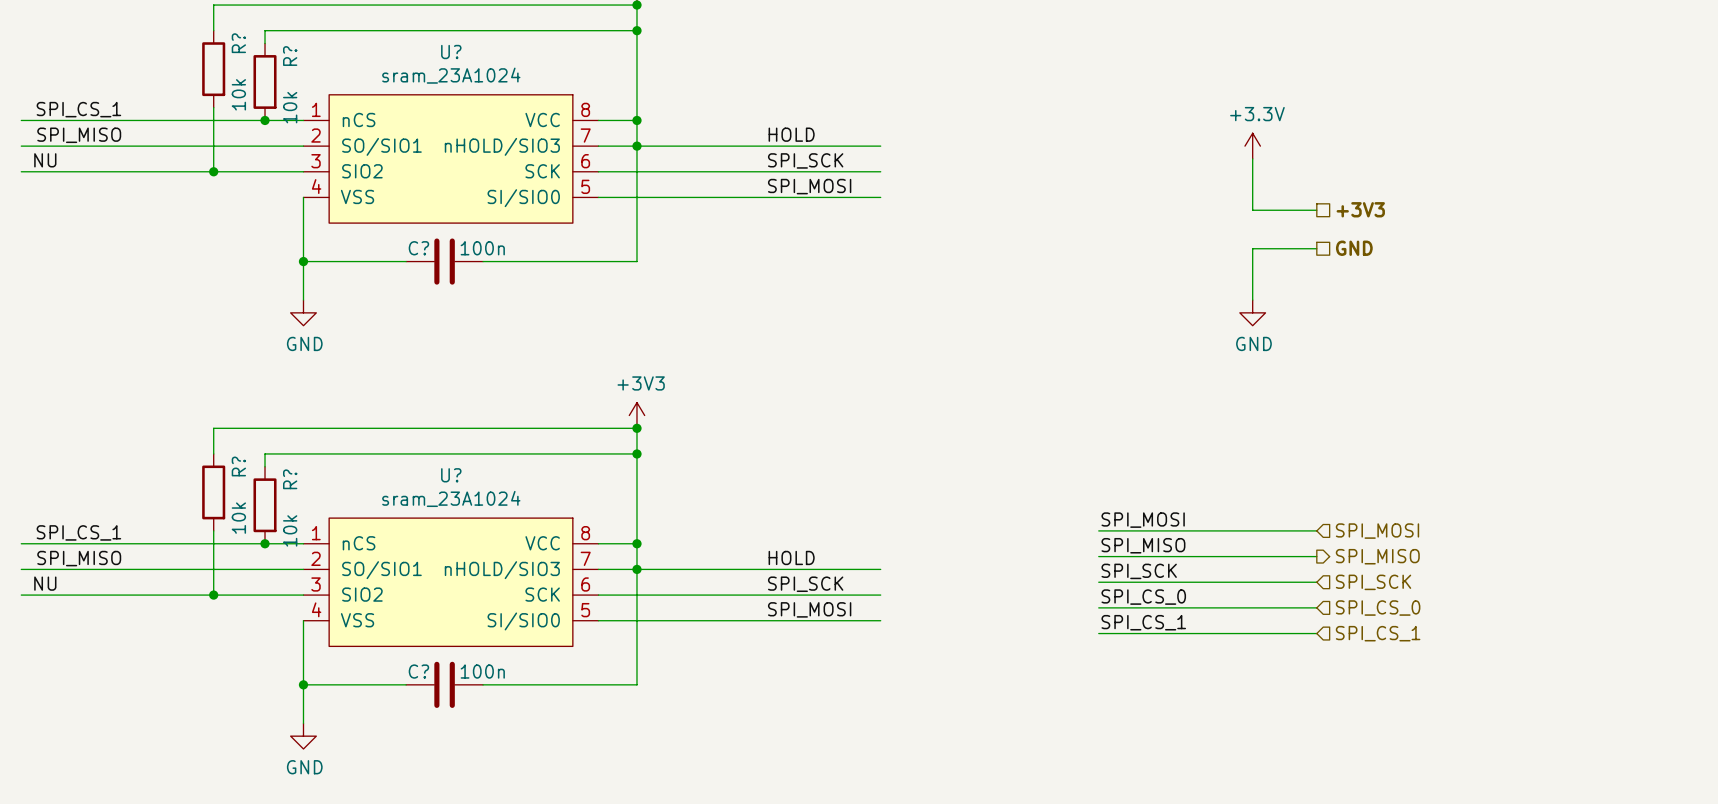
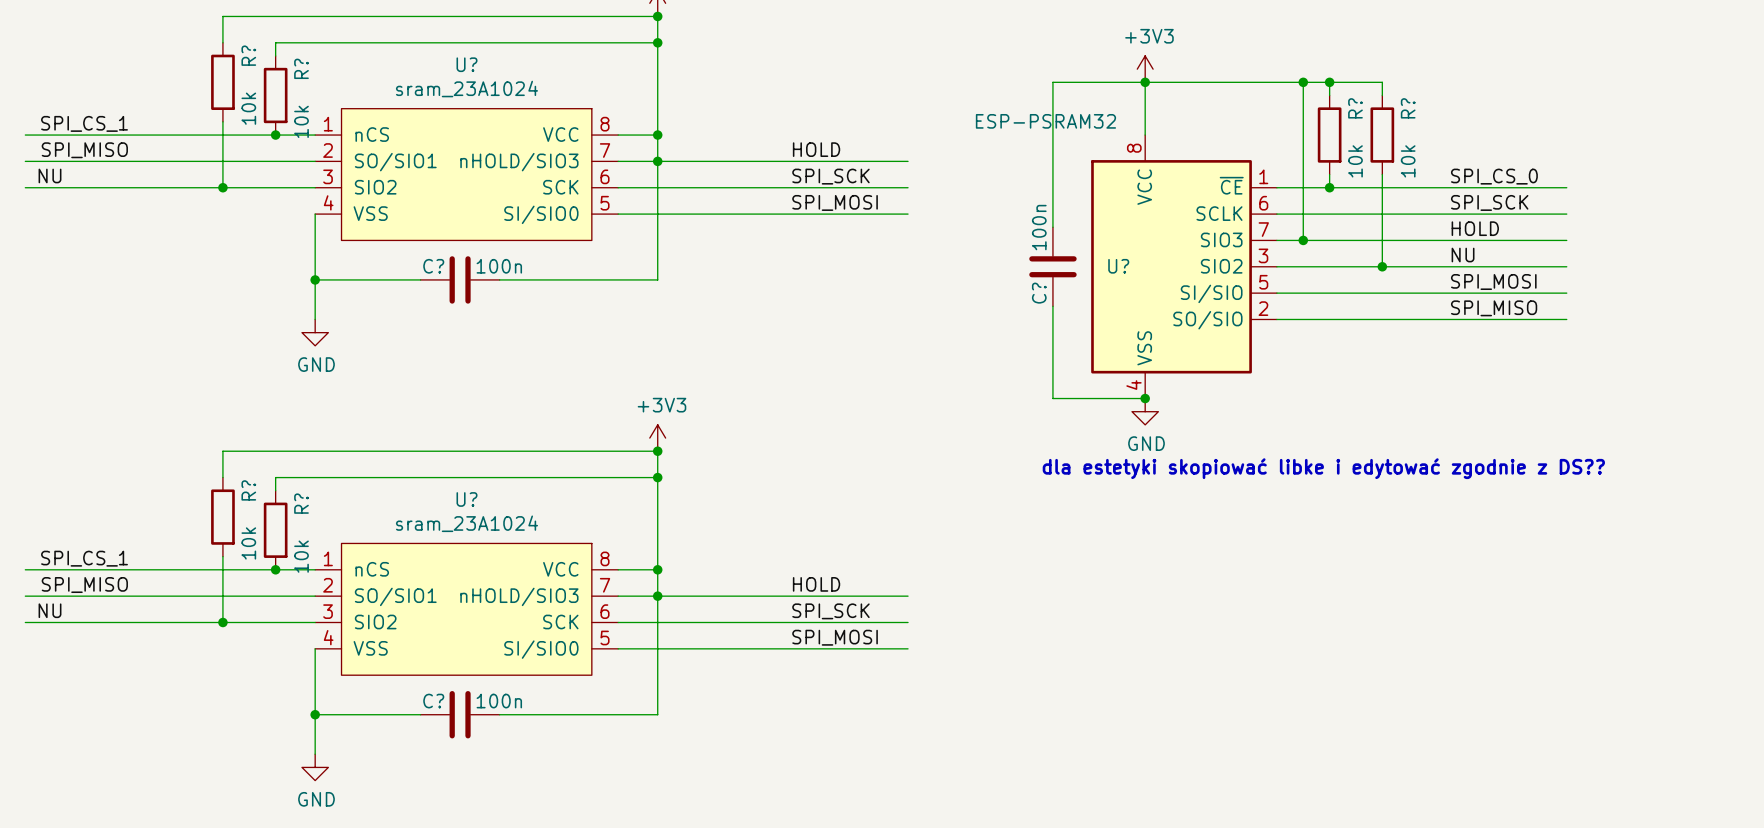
power symbol: none -> +3V3 (1145, 69)
wire: none -> (1145, 82) (1145, 135)
junction: none -> (1145, 82)
wire: none -> (1303, 82) (1303, 240)
junction: none -> (1303, 82)
wire: none -> (1329, 82) (1329, 95)
junction: none -> (1329, 82)
wire: none -> (1382, 95) (1382, 82) (1052, 82) (1052, 227)
R?: none -> 10k (1329, 135)
R?: none -> 10k (1382, 135)
power symbol: +3.3V (1252, 146) -> none
wire: (1252, 158) (1252, 210) (1316, 210) -> none
wire: none -> (1329, 174) (1329, 187)
wire: none -> (1382, 174) (1382, 266)
label: none -> SPI_CS_0 (1494, 176)
wire: none -> (1276, 187) (1566, 187)
junction: none -> (1329, 187)
label: none -> SPI_SCK (1489, 202)
wire: none -> (1276, 214) (1566, 214)
hierarchical label: +3V3 (1360, 209) -> none
label: none -> HOLD (1475, 228)
wire: none -> (1276, 240) (1566, 240)
junction: none -> (1303, 240)
label: none -> NU (1463, 255)
C?: none -> 100n (1052, 266)
U?: none -> ESP-PSRAM32 (1184, 266)
wire: (1252, 248) (1252, 300) -> (1290, 266) (1276, 266)
wire: none -> (1355, 266) (1566, 266)
junction: none -> (1382, 266)
hierarchical label: GND (1354, 248) -> none
label: none -> SPI_MOSI (1493, 282)
wire: none -> (1276, 293) (1566, 293)
wire: none -> (1052, 306) (1052, 398) (1145, 398)
label: none -> SPI_MISO (1494, 308)
wire: none -> (1276, 319) (1566, 319)
power symbol position: GND (1252, 312) -> GND (1145, 411)
junction: none -> (1145, 398)
text: none -> dla estetyki skopiować libke i edytować zgodnie z DS?? (1323, 468)
label: SPI_MOSI (1143, 520) -> none
wire: (1098, 530) (1316, 530) -> none
hierarchical label: SPI_MOSI (1377, 531) -> none
label: SPI_MISO (1143, 545) -> none
wire: (1098, 556) (1316, 556) -> none
hierarchical label: SPI_MISO (1377, 556) -> none
label: SPI_SCK (1139, 571) -> none
wire: (1098, 582) (1316, 582) -> none
hierarchical label: SPI_SCK (1373, 582) -> none
label: SPI_CS_0 (1143, 597) -> none
wire: (1098, 607) (1316, 607) -> none
hierarchical label: SPI_CS_0 (1378, 608) -> none
label: SPI_CS_1 (1143, 622) -> none
wire: (1098, 633) (1316, 633) -> none
hierarchical label: SPI_CS_1 (1378, 633) -> none

